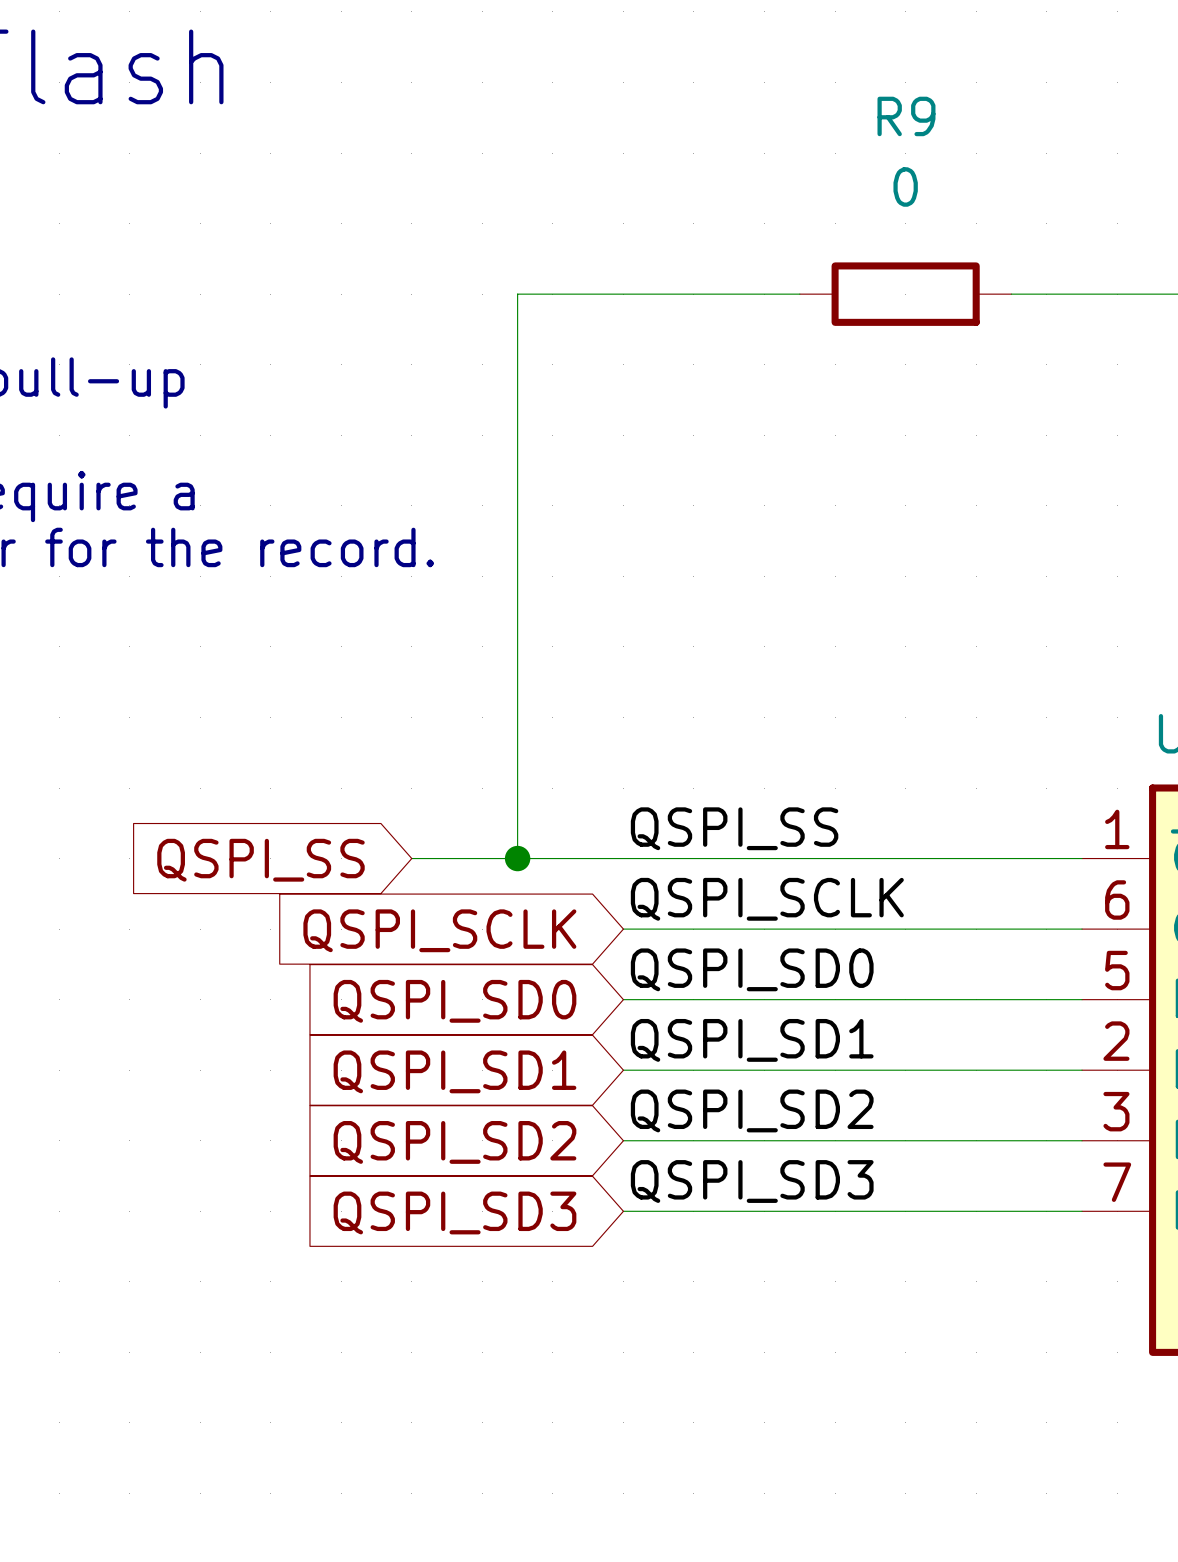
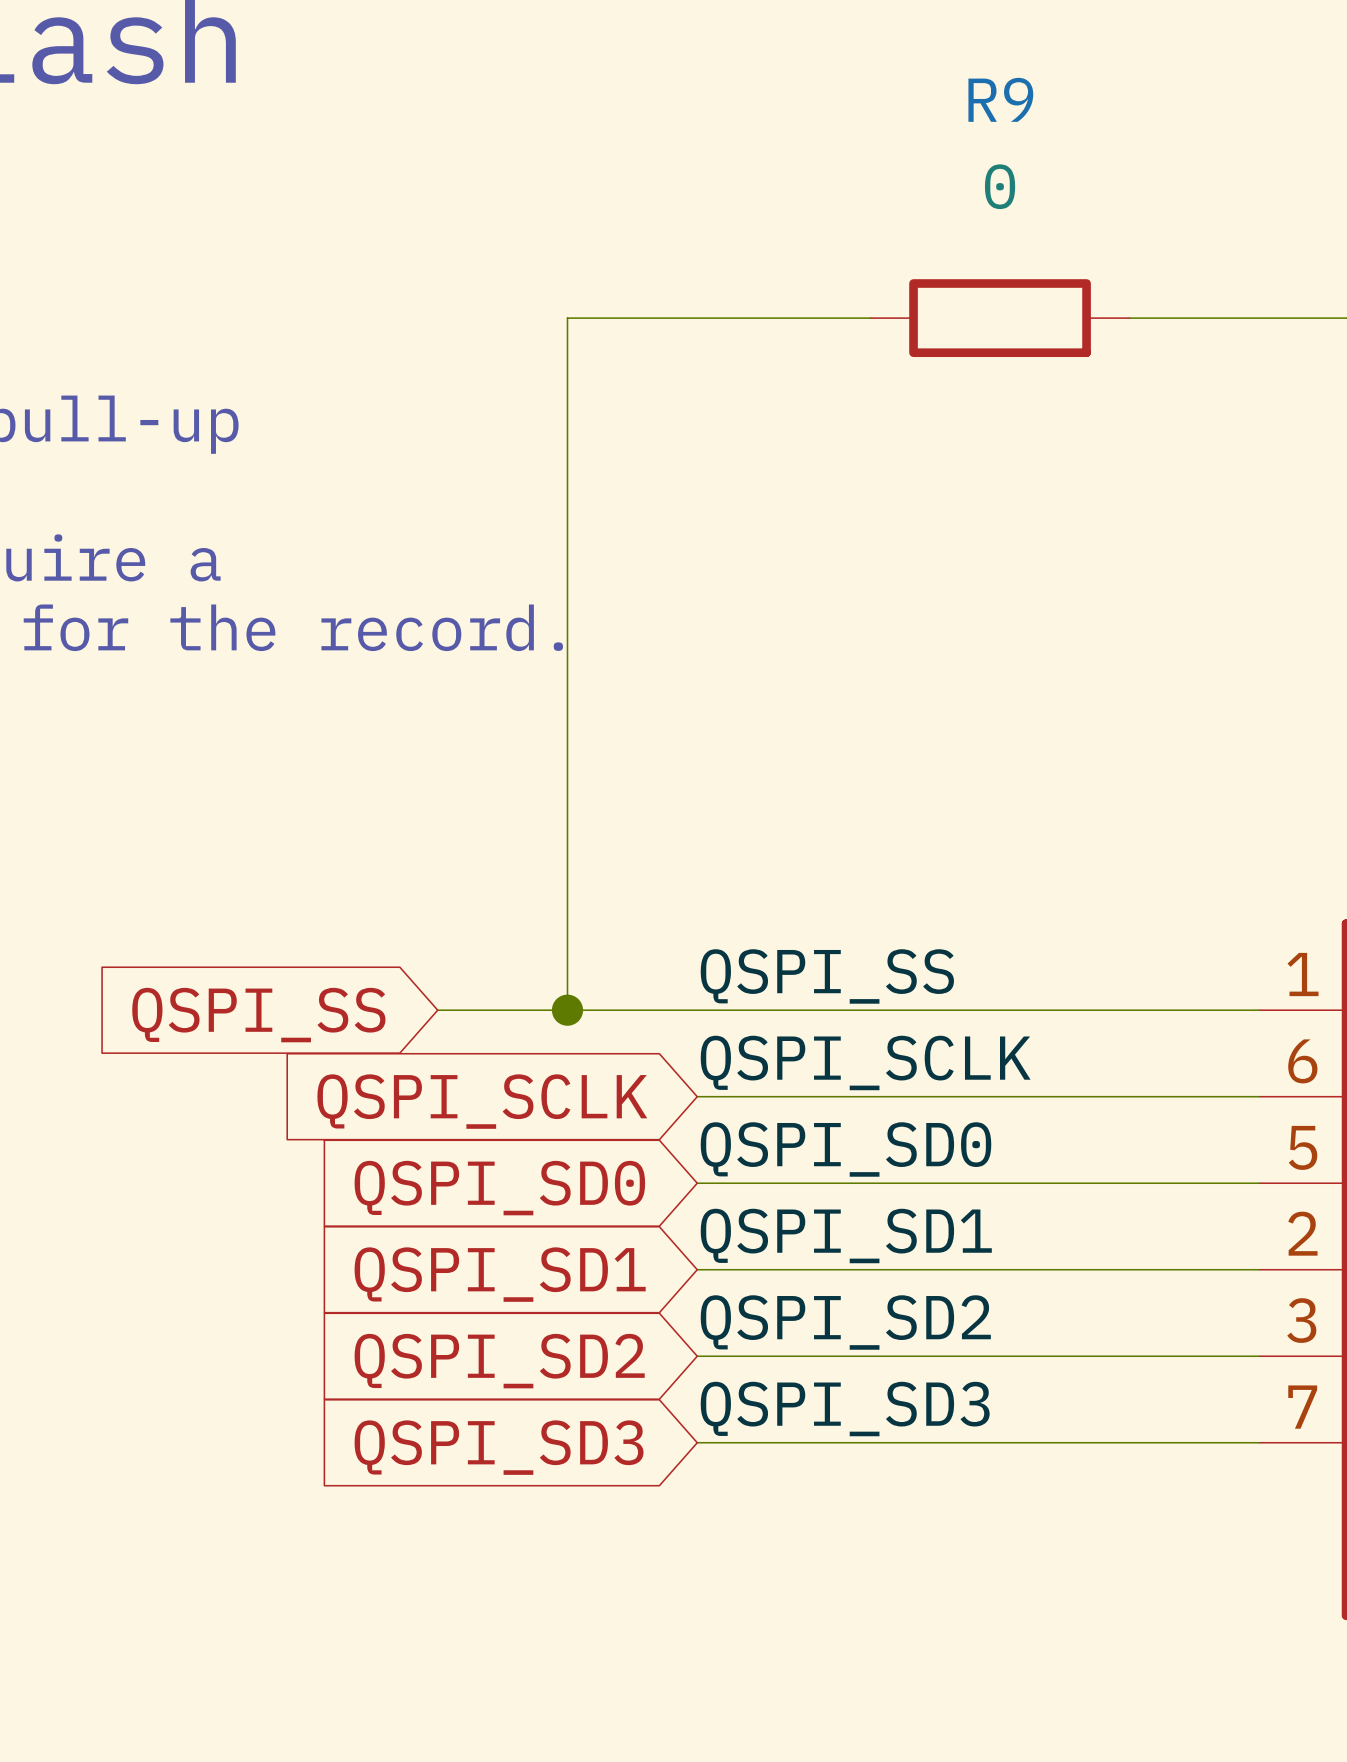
R9 position: (905, 294) -> (1000, 318)

